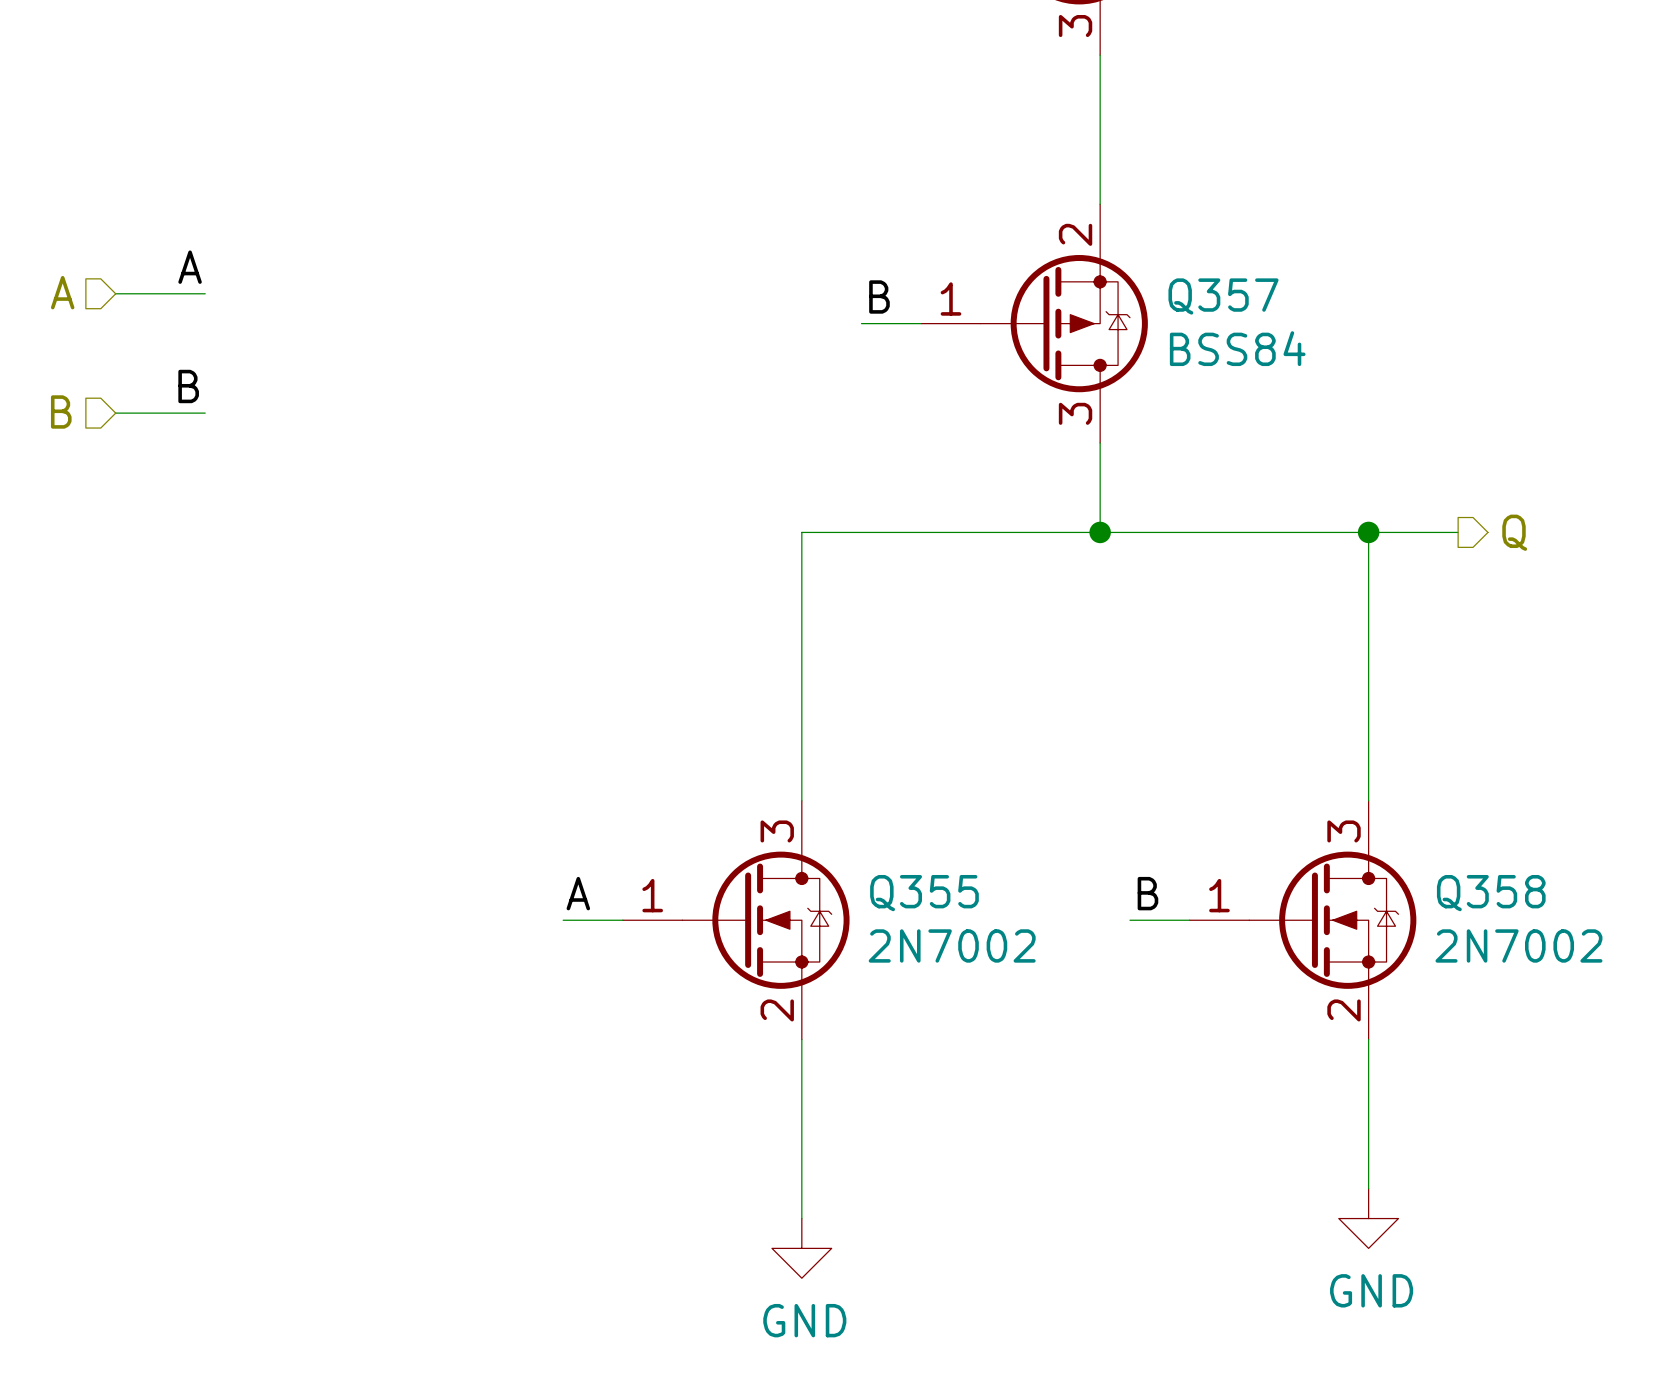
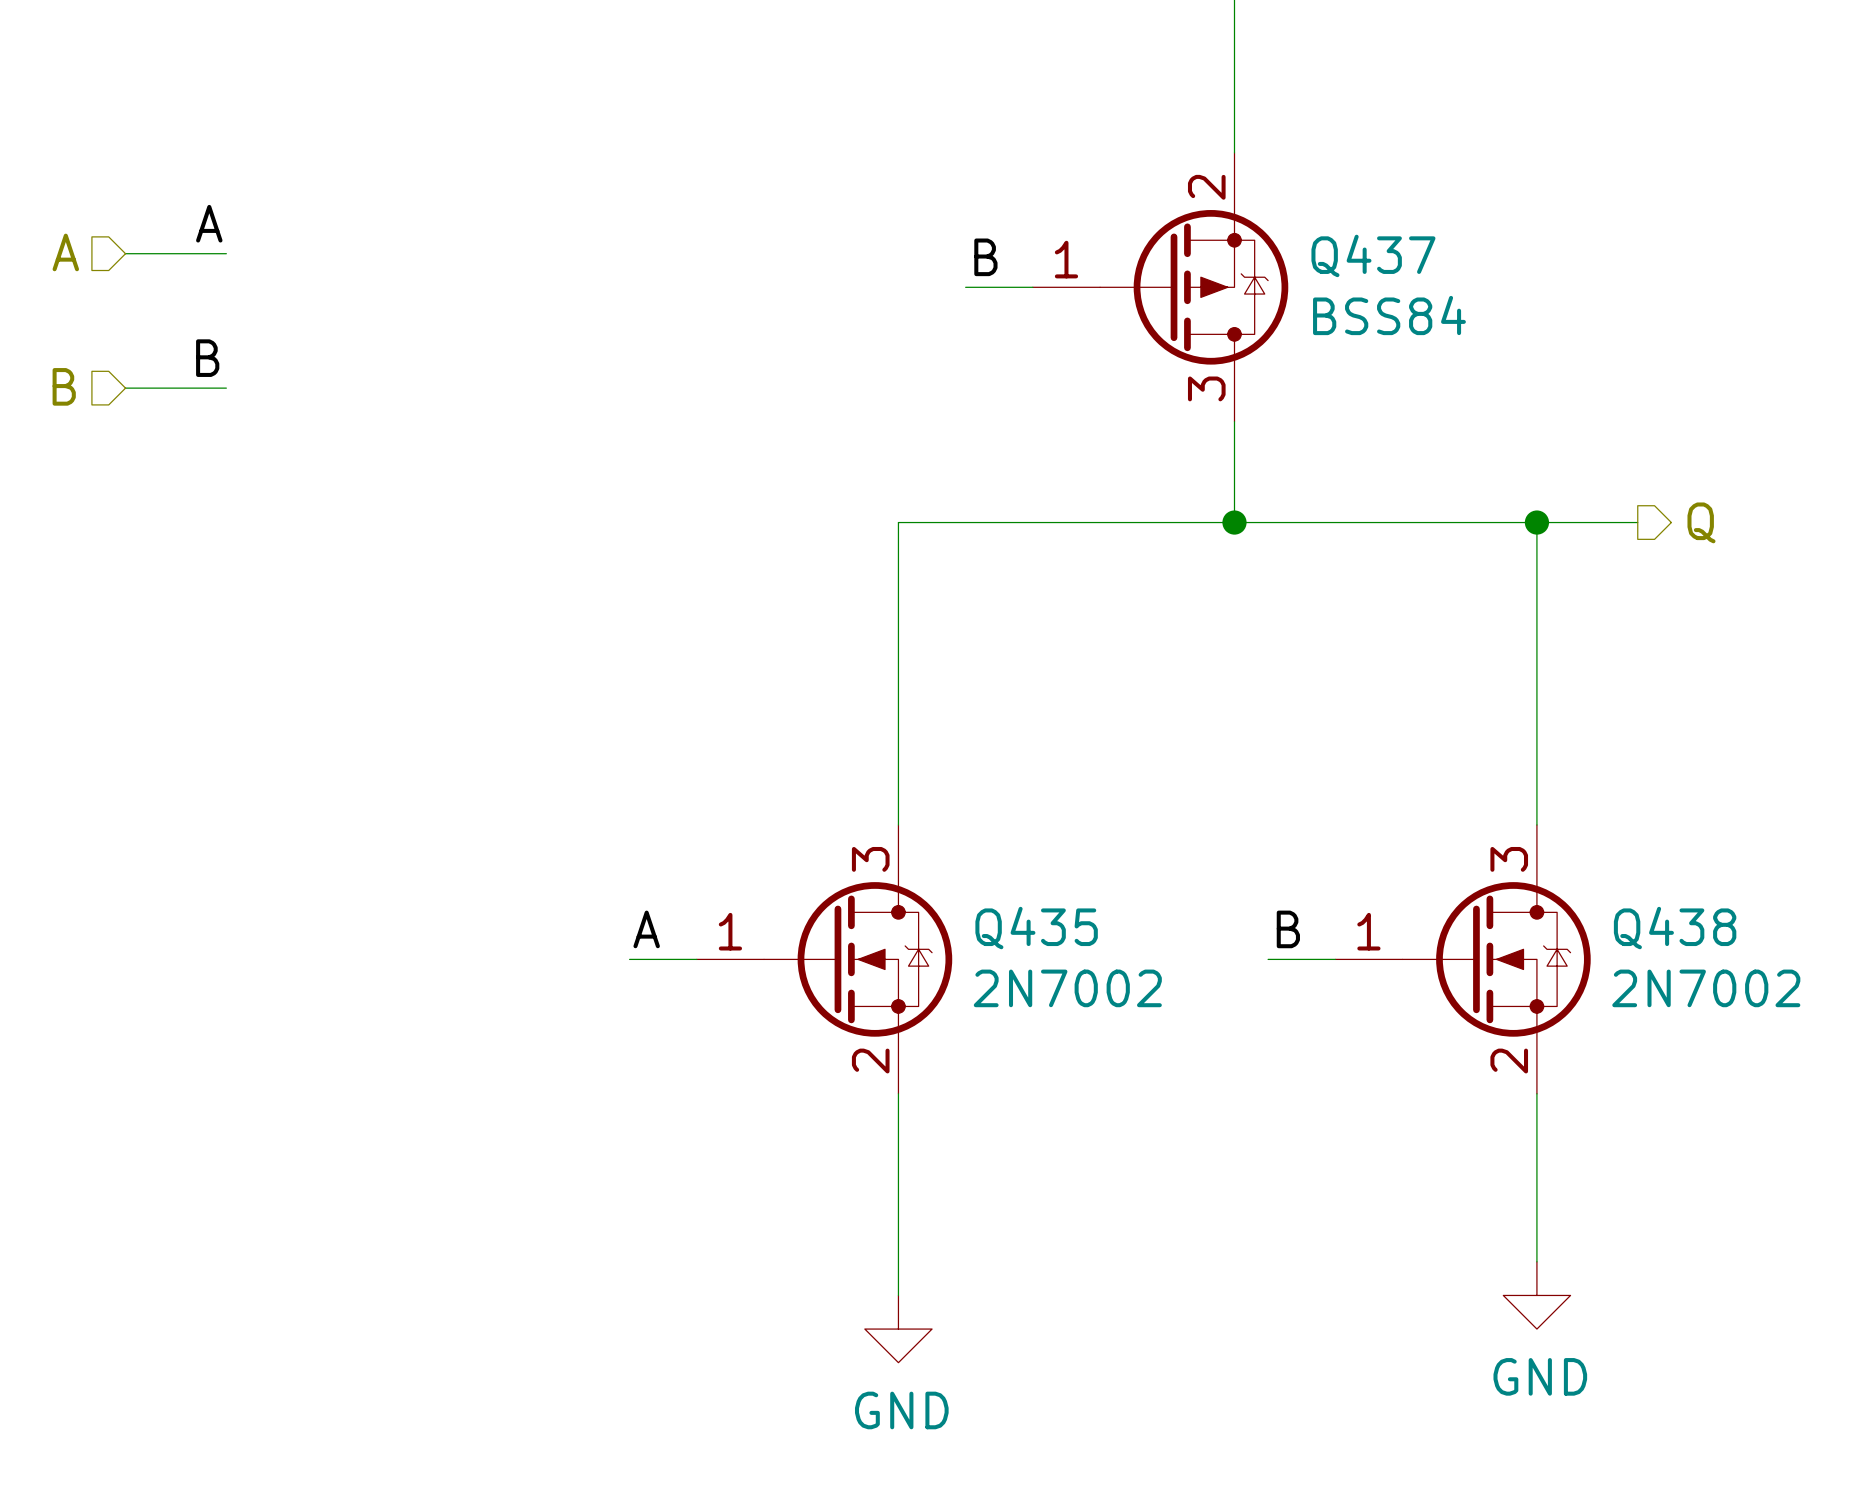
Q357 name: Q357 (1223, 296) -> Q437 (1373, 255)
Q355 name: Q355 (924, 893) -> Q435 (1036, 928)
Q358 name: Q358 (1491, 893) -> Q438 (1675, 928)

